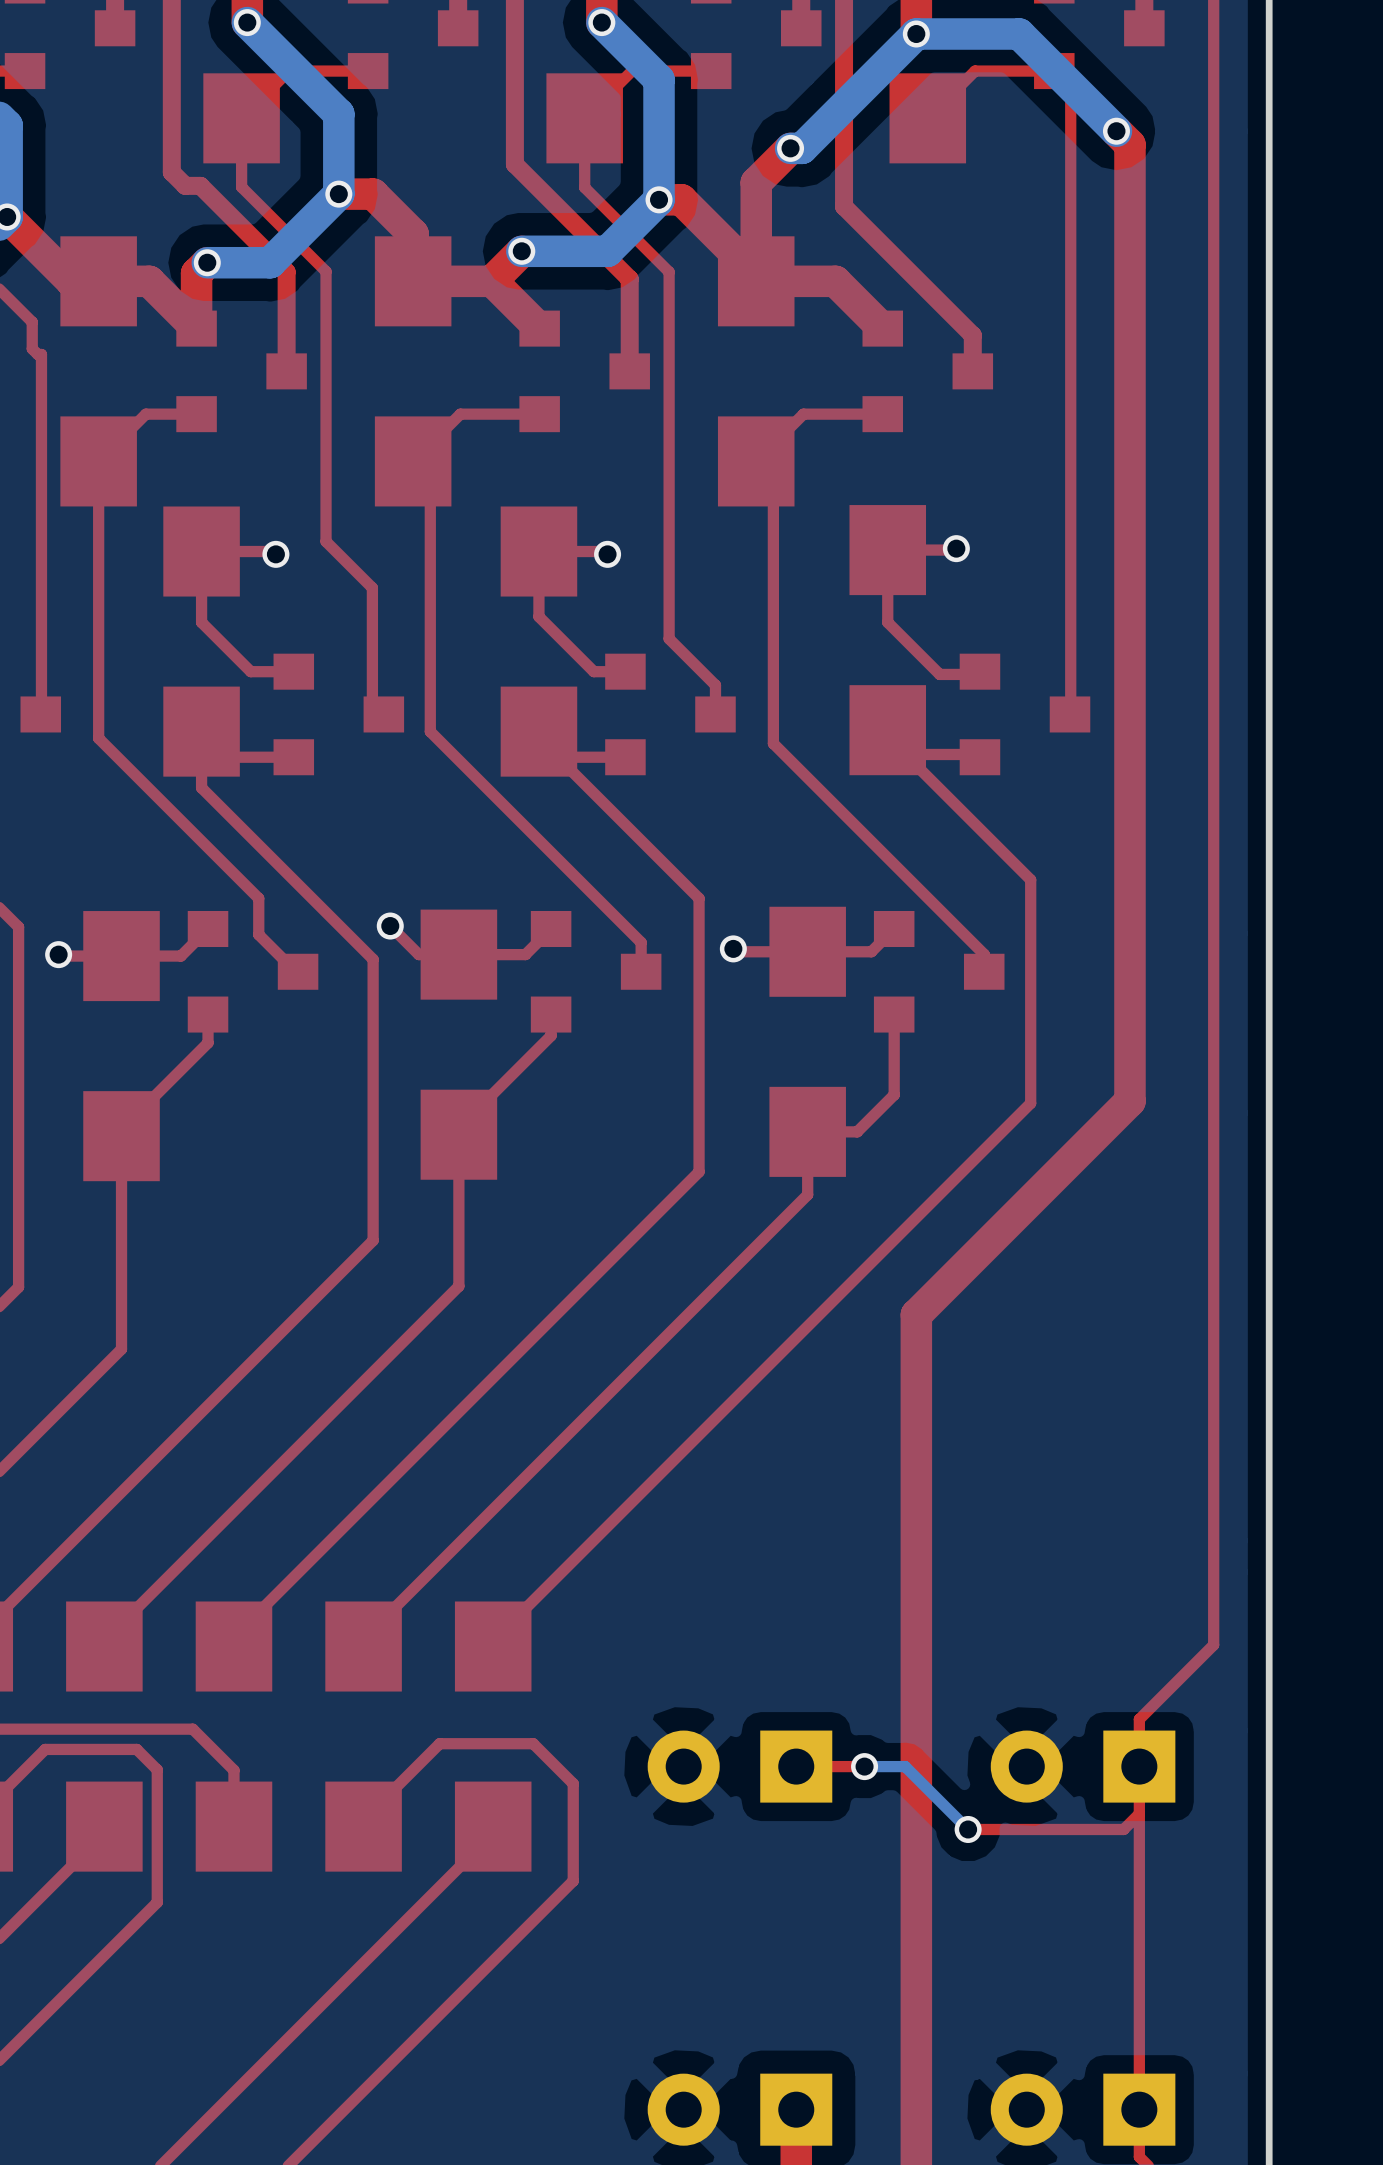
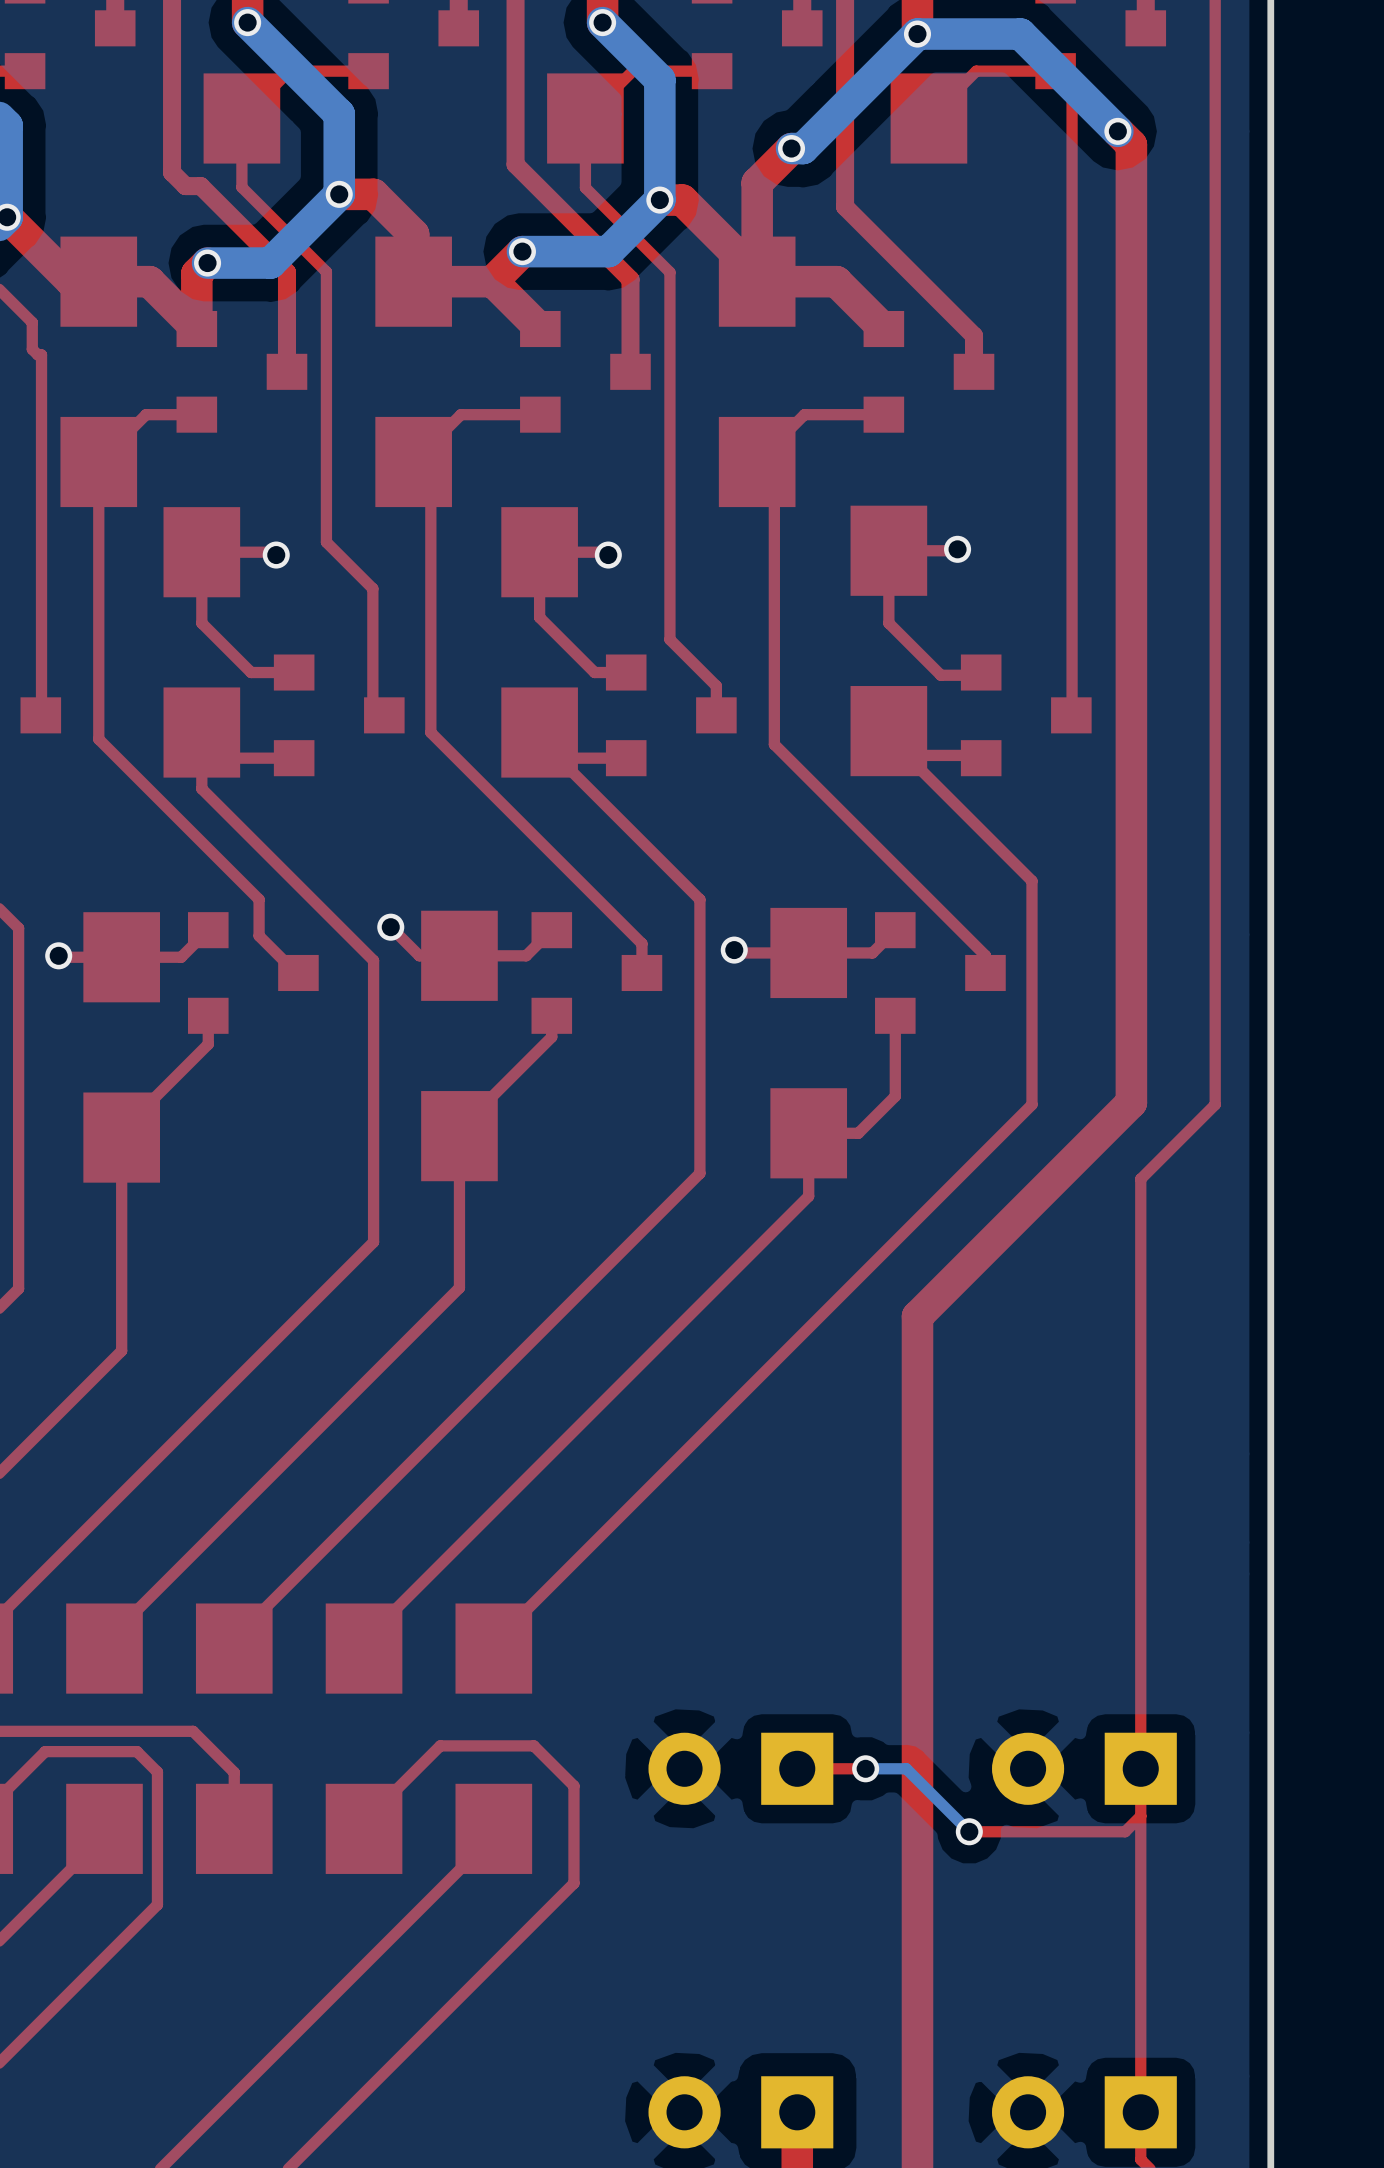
top track: (1213, 1103) (1213, 1644) (1139, 1719) -> (1215, 1104) (1140, 1179) (1140, 1721)

